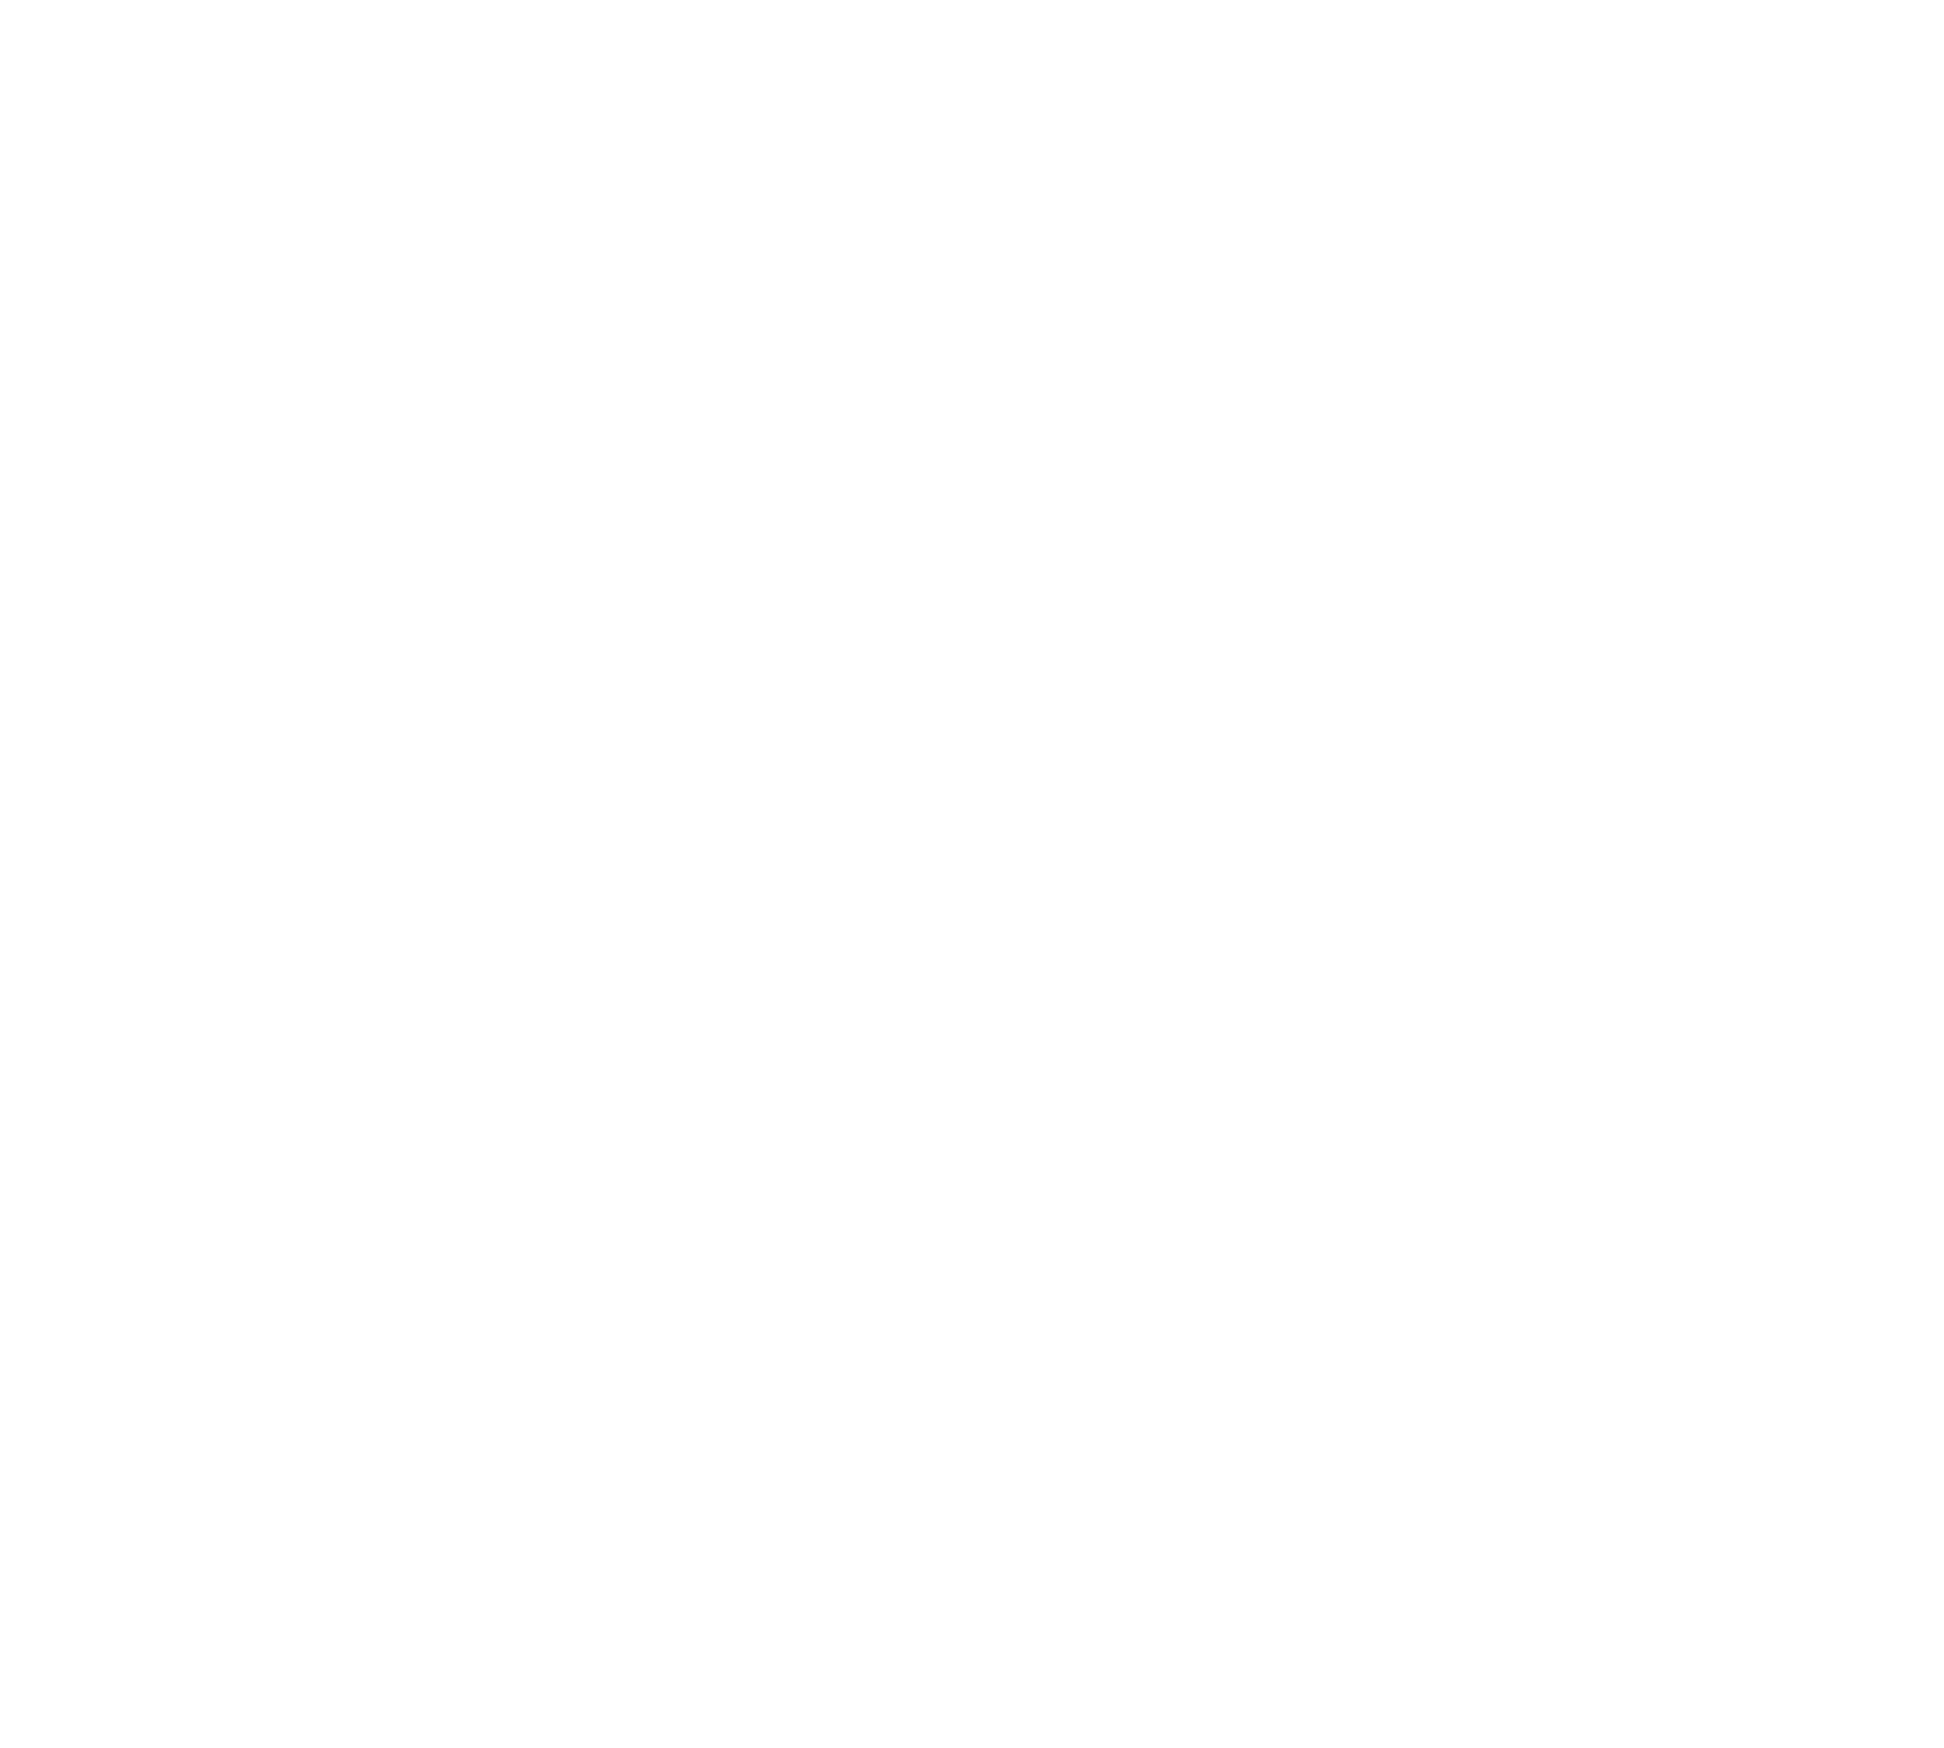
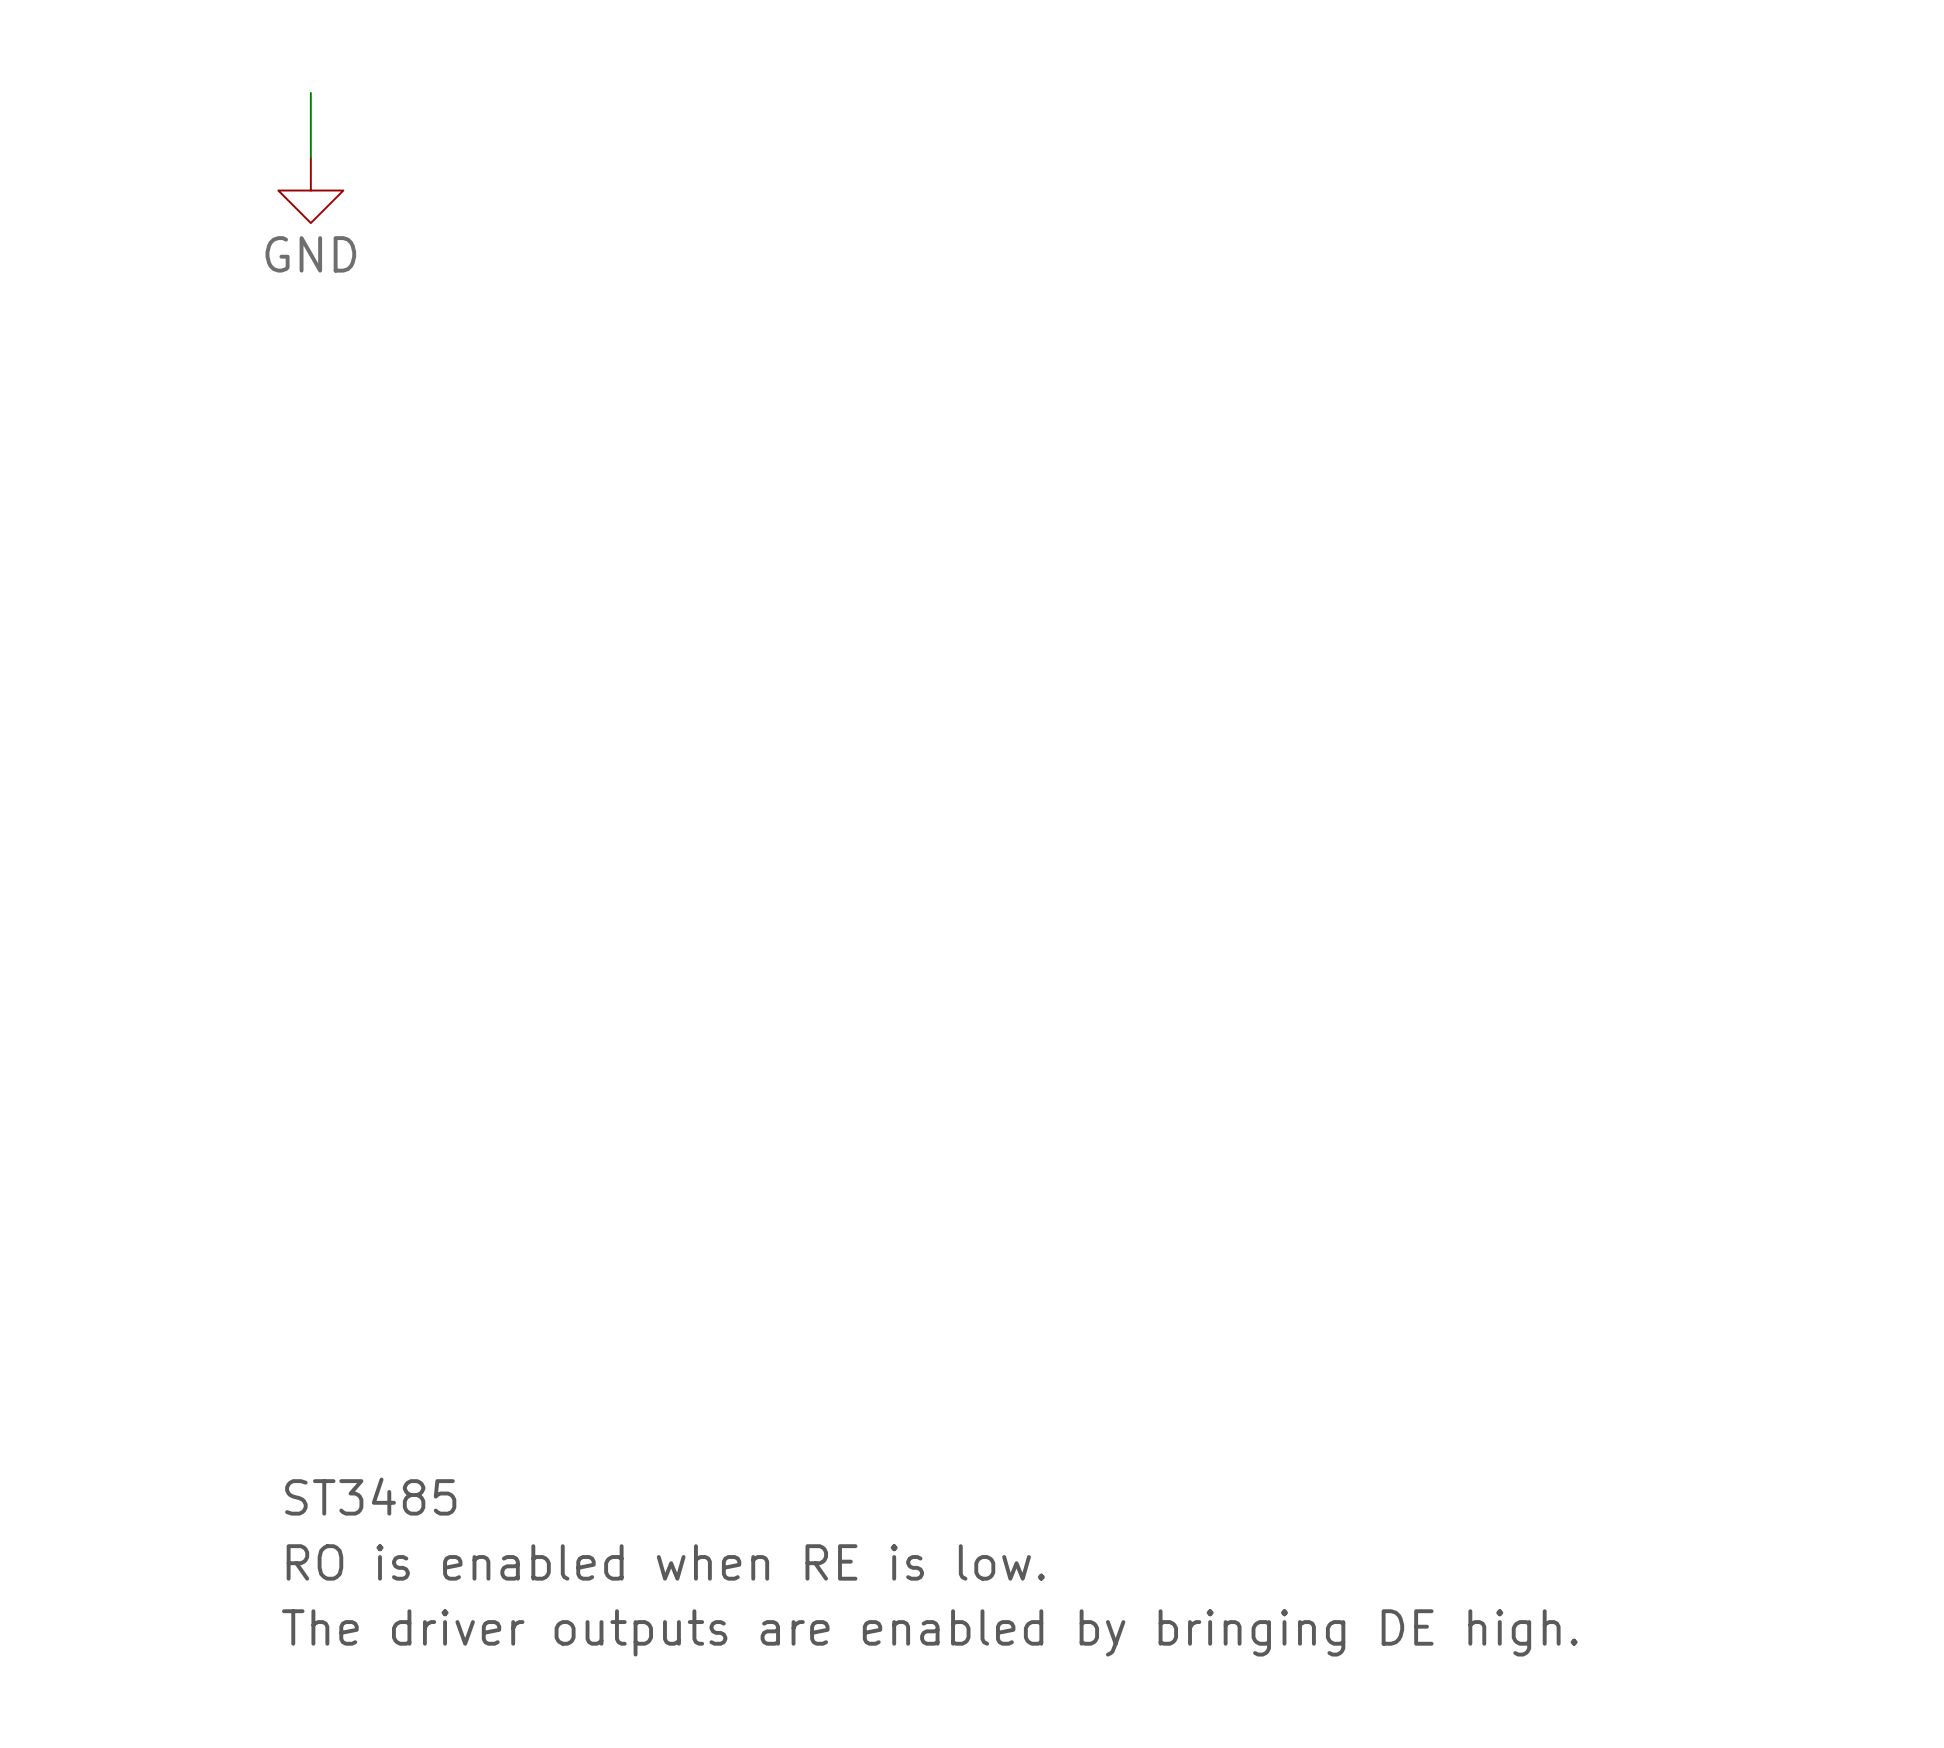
wire: none -> (310, 92) (310, 158)
power symbol: none -> GND (310, 190)
text: none -> ST3485 (370, 1496)
text: none -> RO is enabled when RE is low. (665, 1562)
text: none -> The driver outputs are enabled by bringing DE high. (929, 1632)

